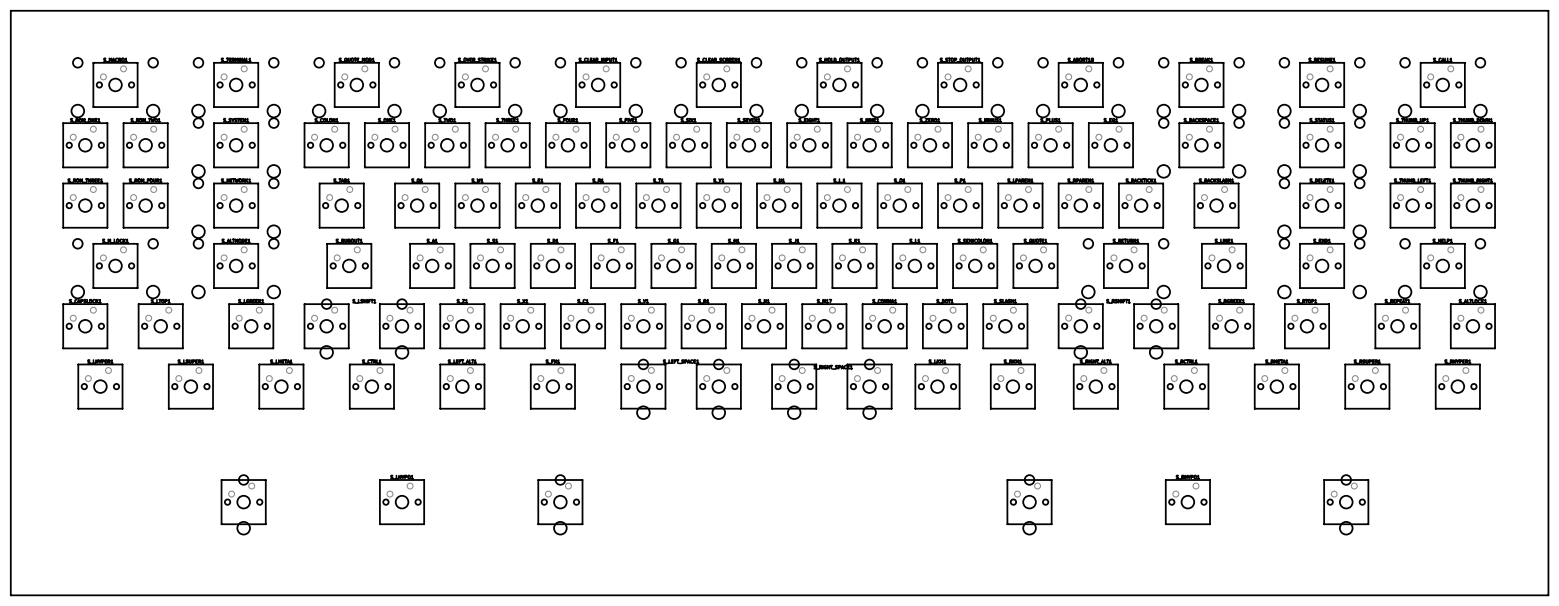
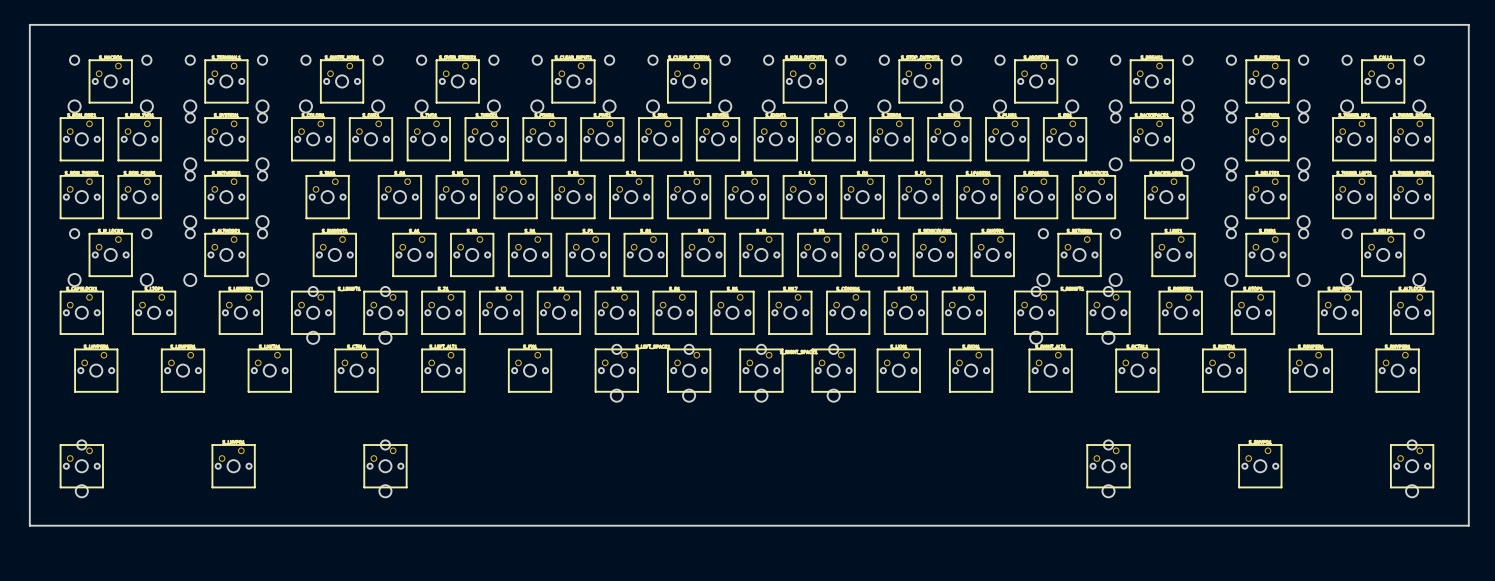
board edge: (10, 10) (1548, 10) (1548, 595) (10, 595) (10, 10) -> (29, 24) (29, 525) (1468, 525) (1468, 24) (29, 24)
part position: (402, 504) -> (233, 468)
part position: (1187, 504) -> (1260, 468)

